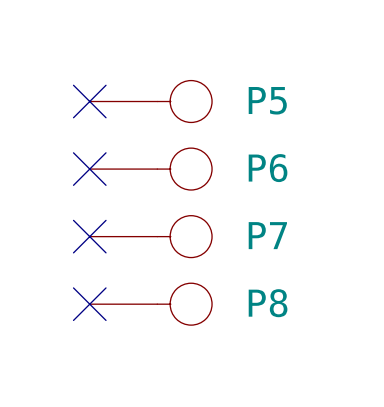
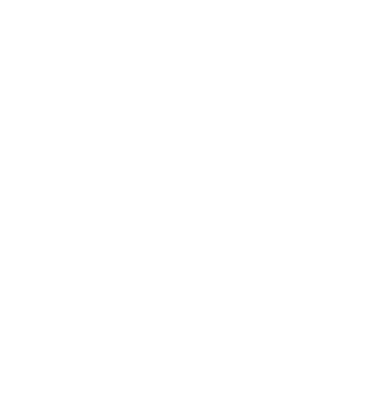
no-connect mark: (89, 101) -> none
P5: (150, 101) -> none
no-connect mark: (89, 169) -> none
P6: (150, 169) -> none
no-connect mark: (89, 236) -> none
P7: (150, 236) -> none
no-connect mark: (89, 304) -> none
P8: (150, 304) -> none

